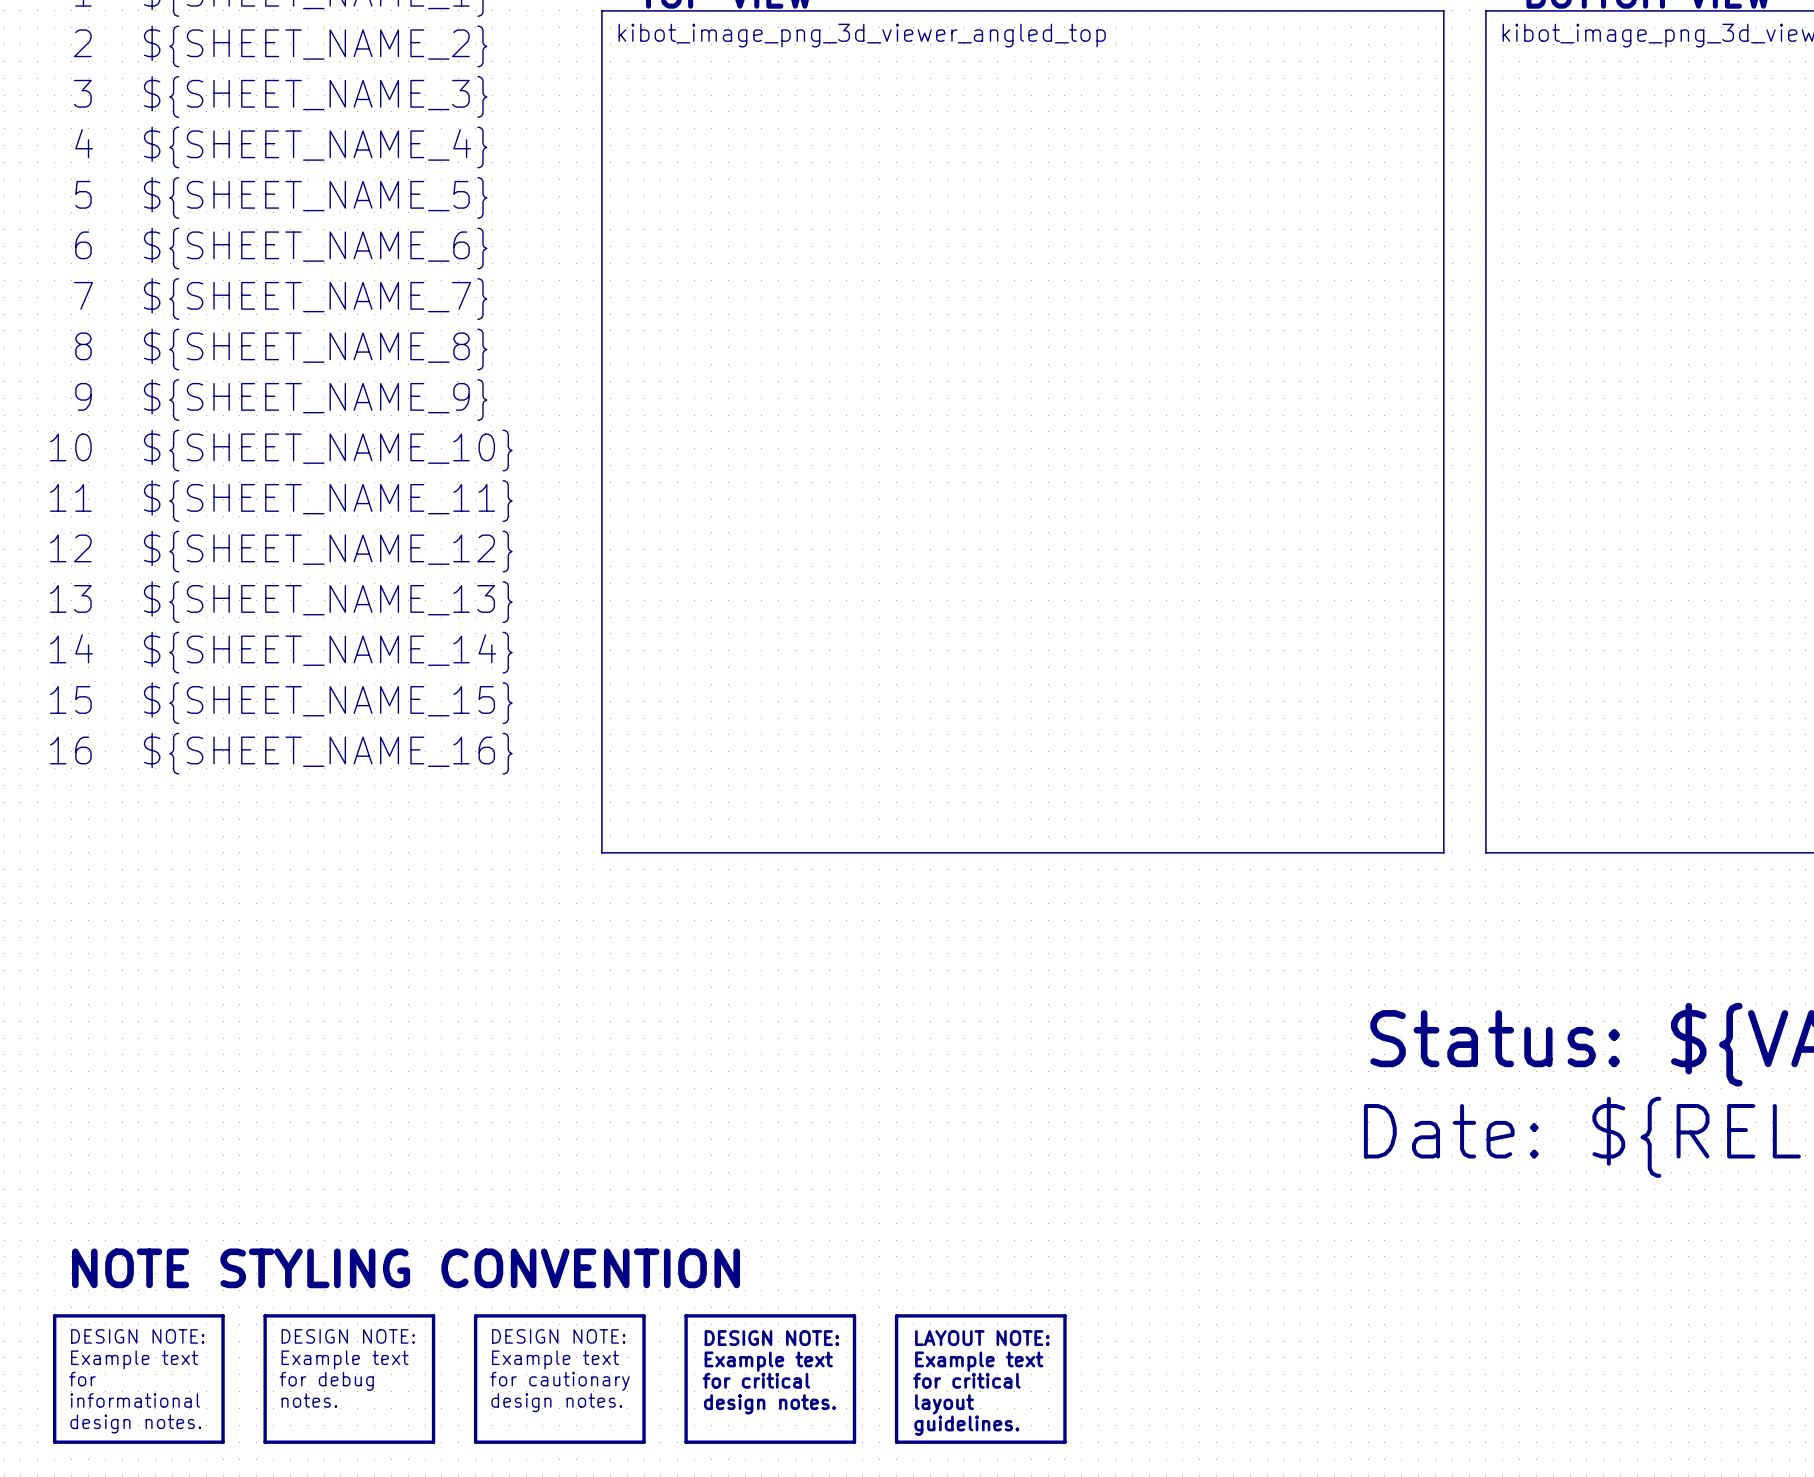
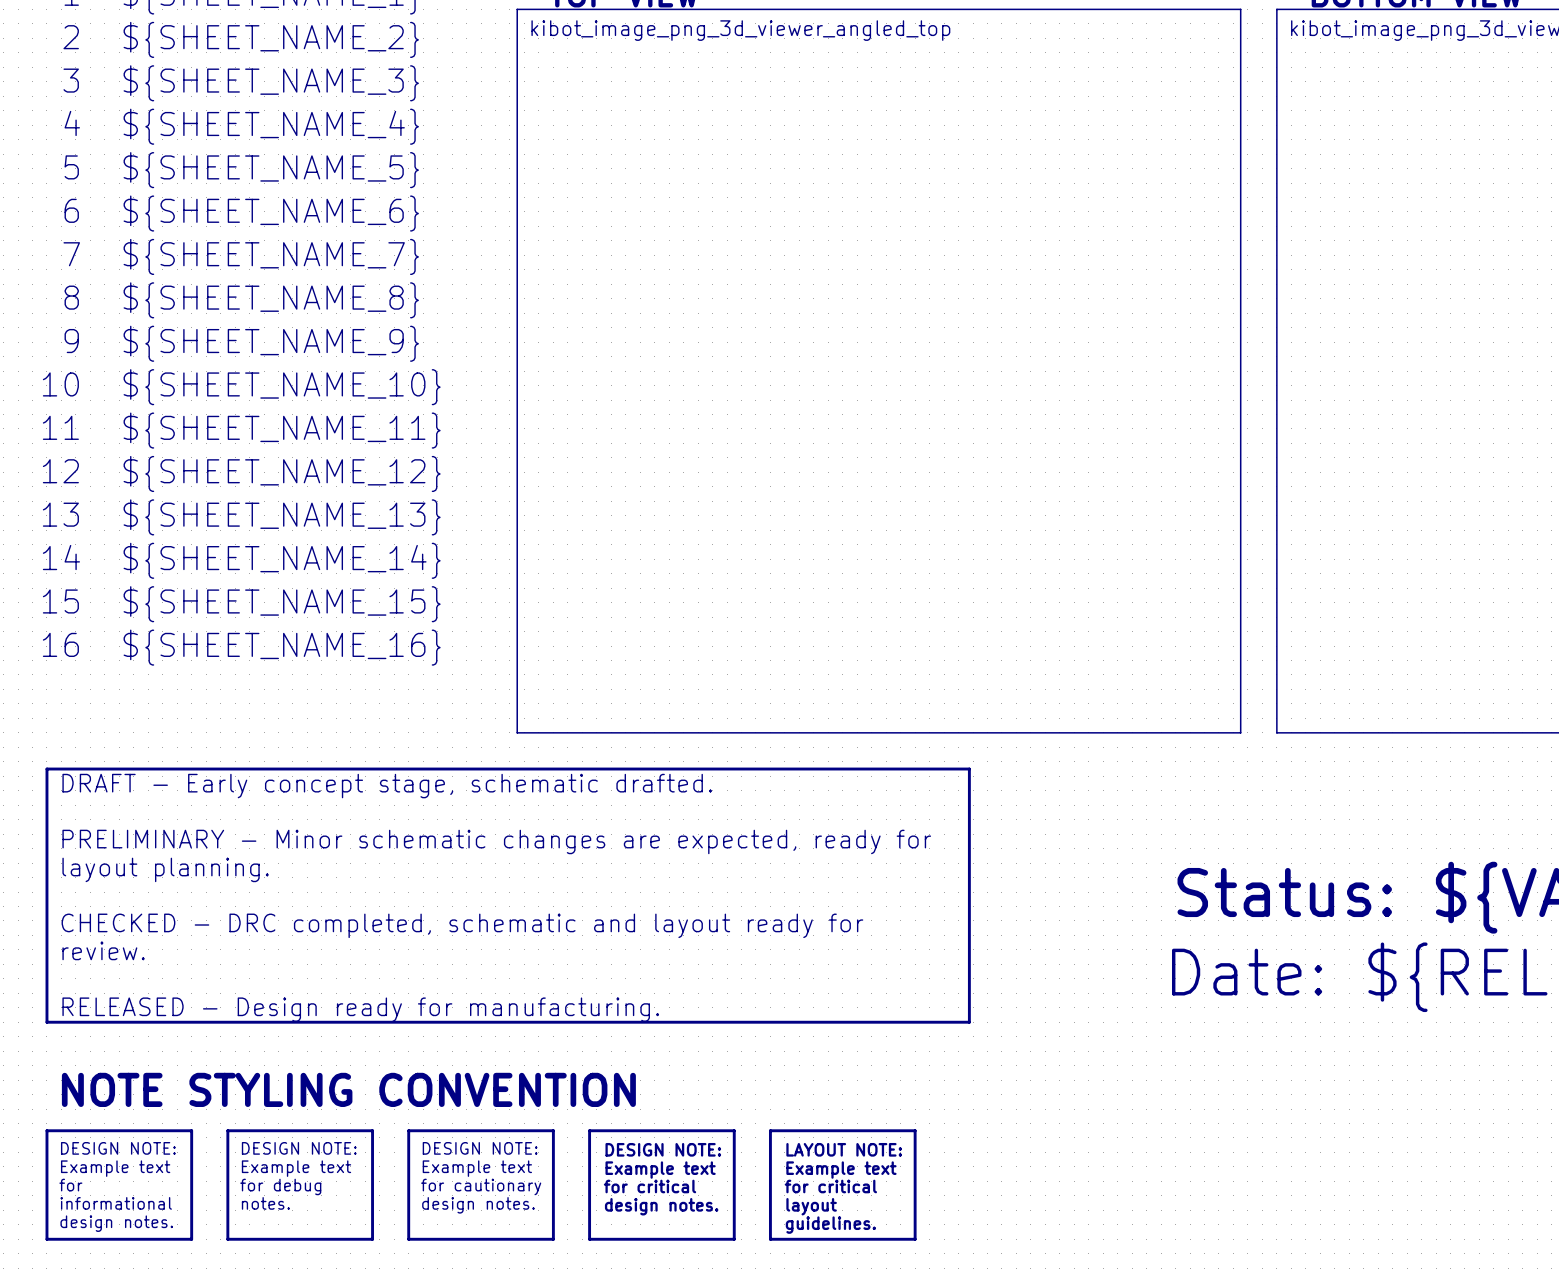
line: none -> (46, 769) (969, 769) (969, 1022) (46, 1022) (46, 769)
text: none -> DRAFT - Early concept stage, schematic drafted. (387, 786)
text: none -> PRELIMINARY - Minor schematic changes are expected, ready for (496, 841)
text: none -> layout planning. (165, 869)
text: none -> CHECKED - DRC completed, schematic and layout ready for (462, 925)
text: none -> review. (103, 950)
text: none -> RELEASED - Design ready for manufacturing. (360, 1009)

